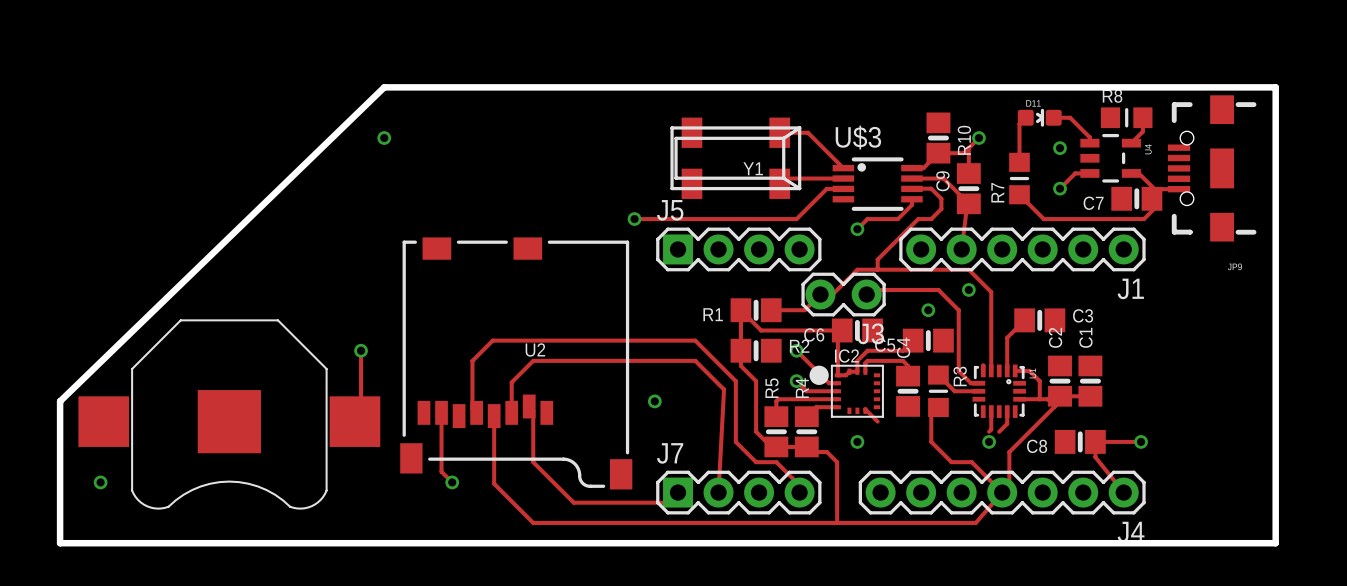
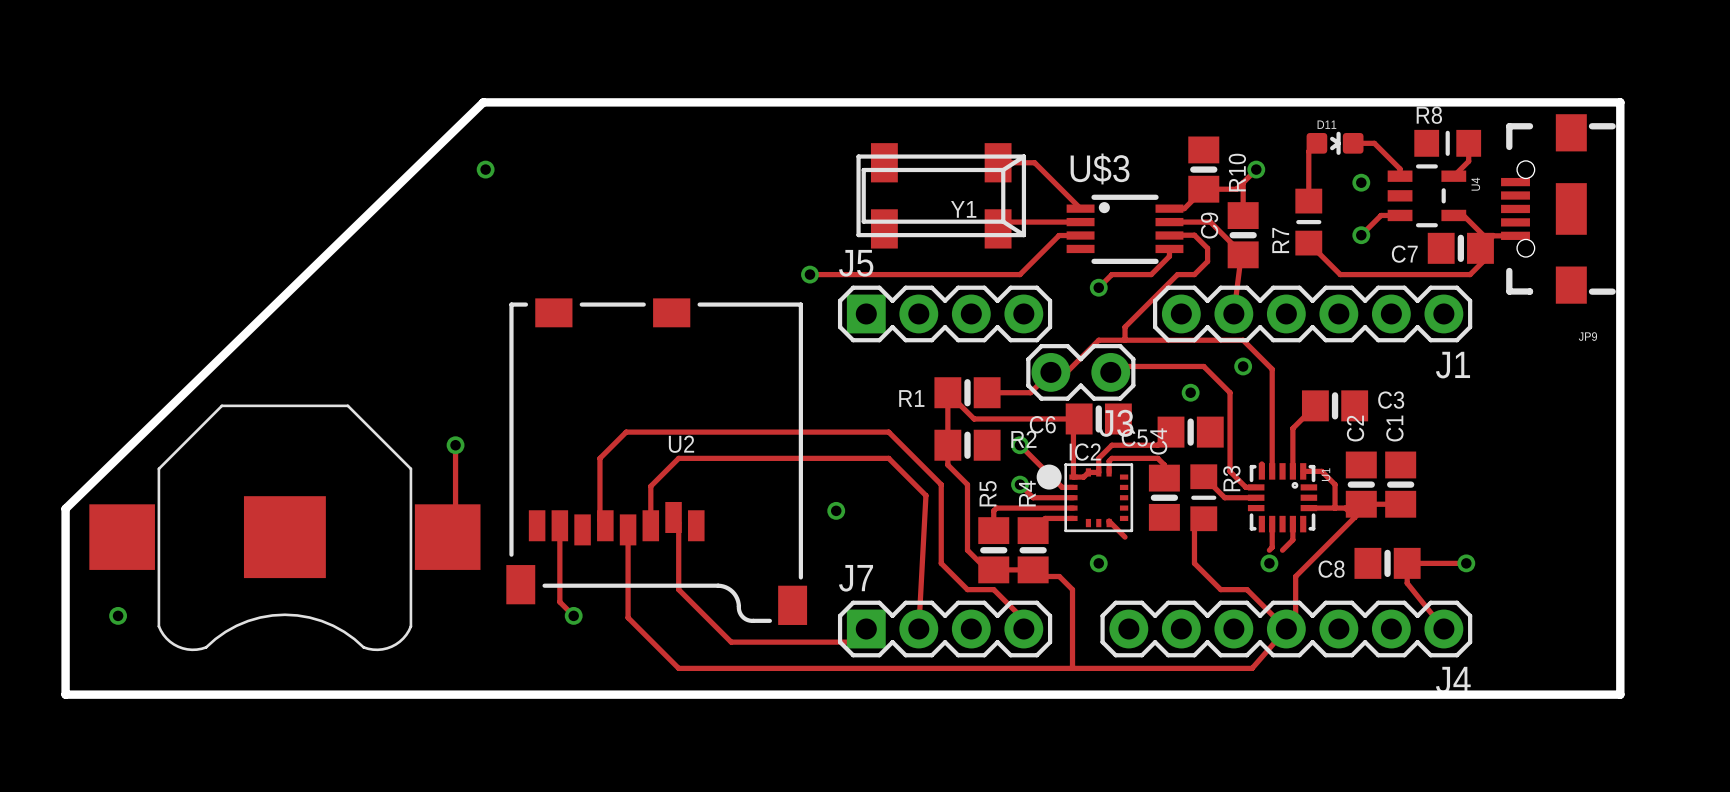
board edge: (60, 401) (384, 87) (1275, 87) (1275, 543) (1259, 543) -> (65, 510) (483, 102) (1620, 102) (1620, 694)

